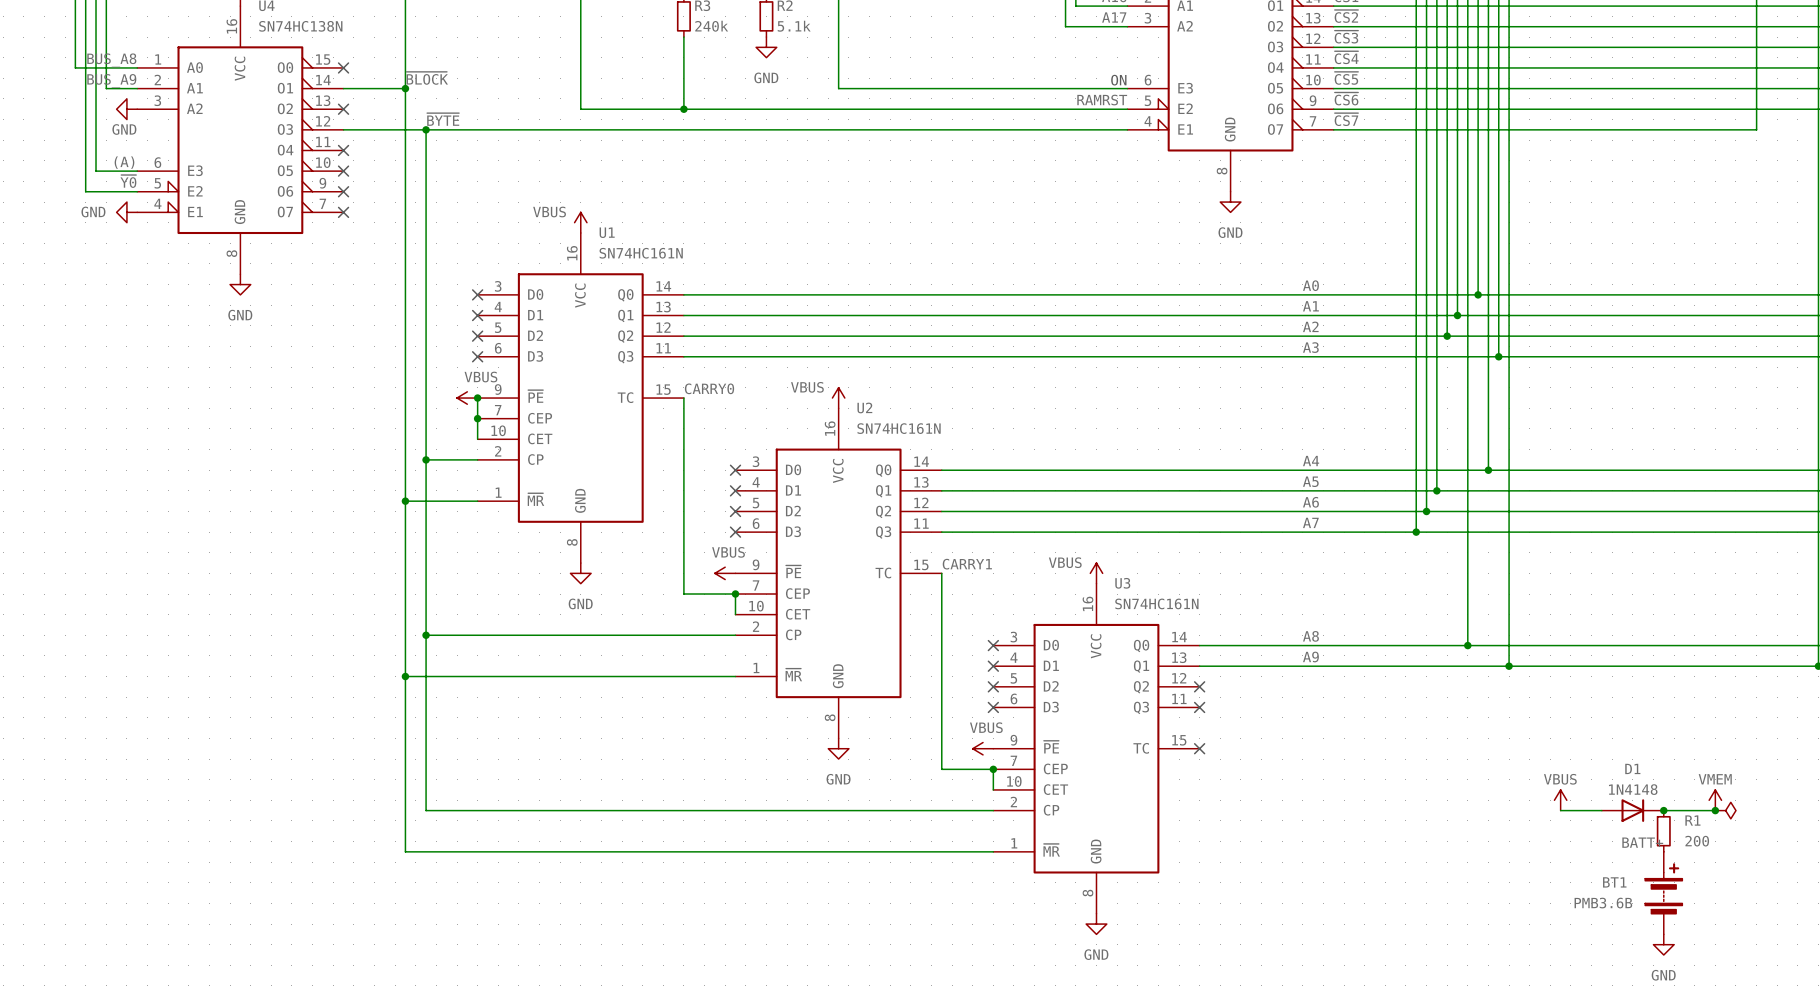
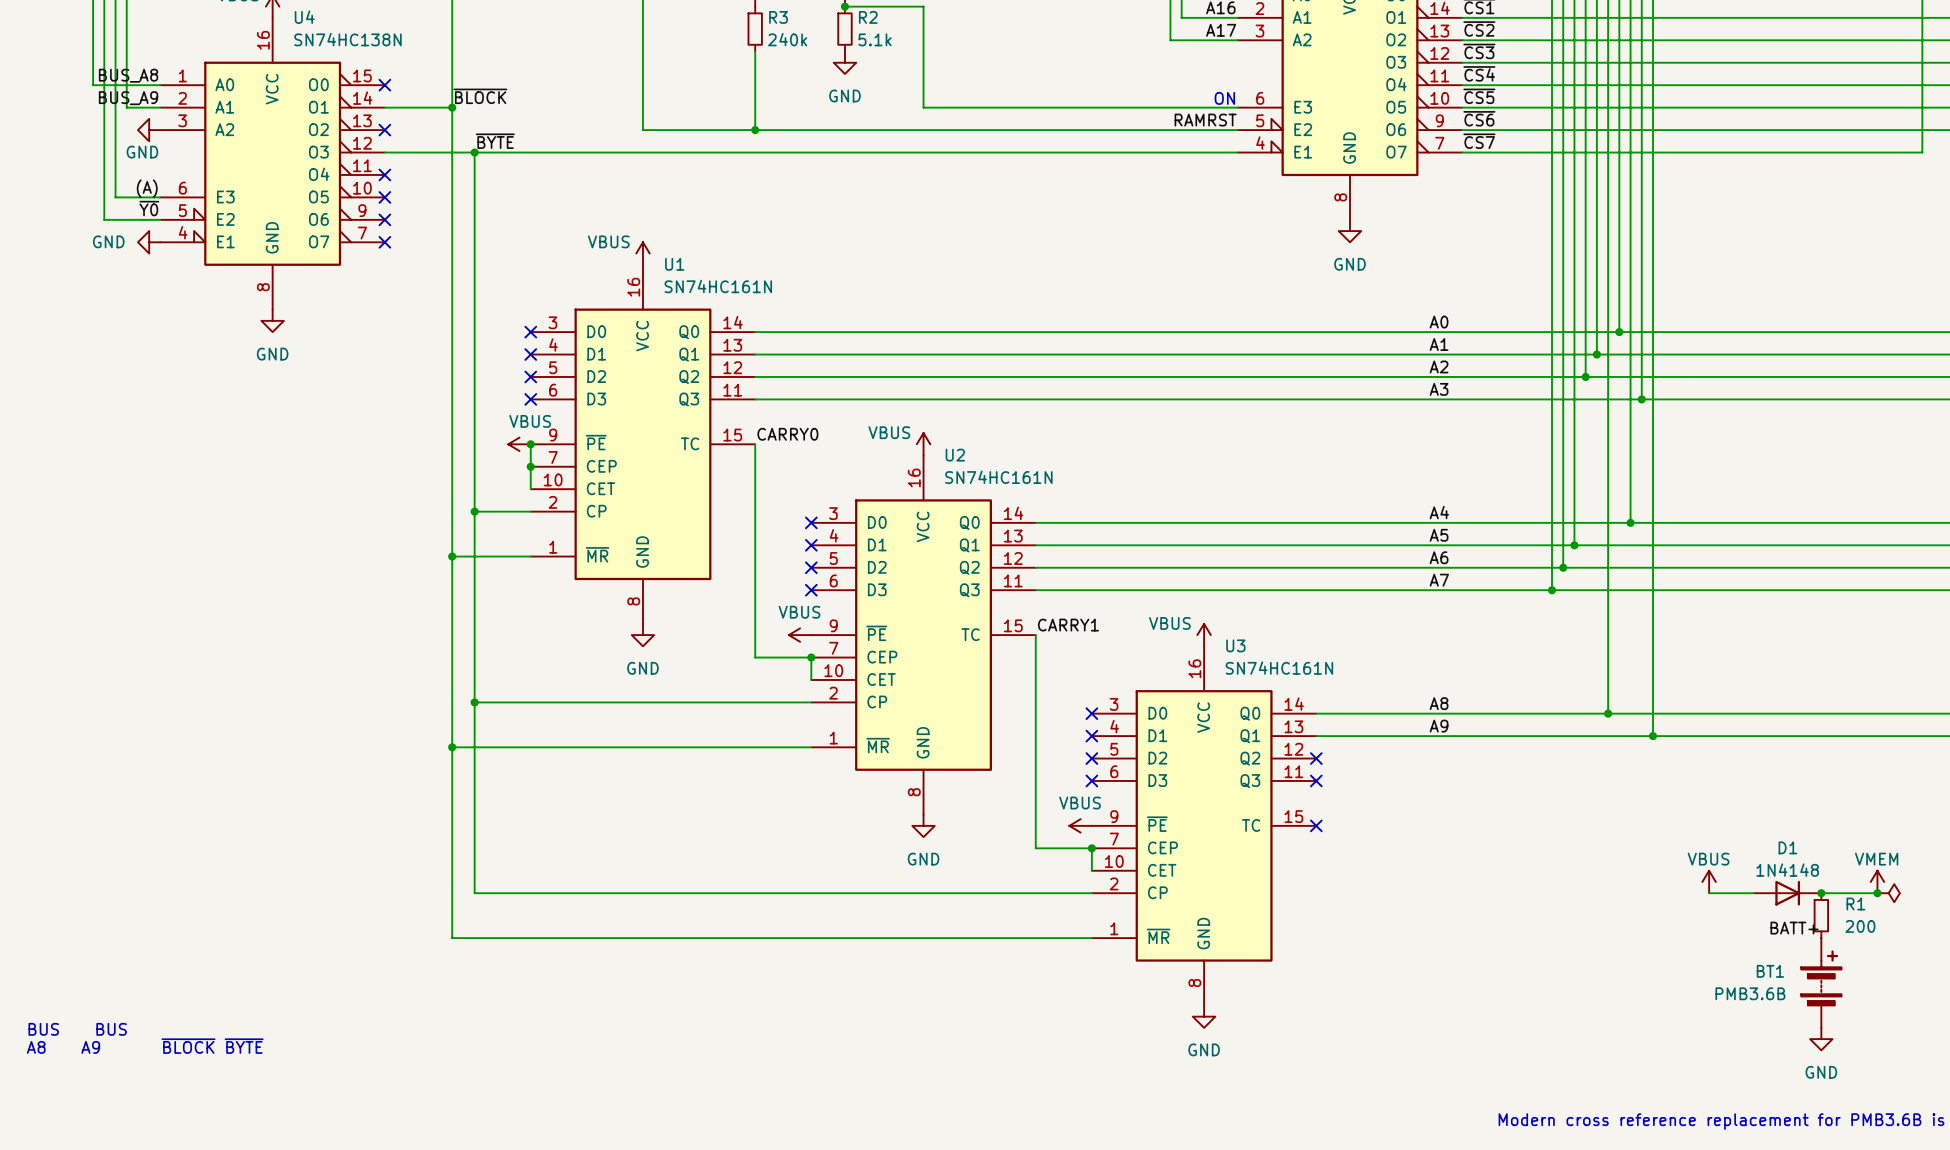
text: none -> BUS BUS (77, 1029)
text: none -> A8 A9 ~{BLOCK} ~{BYTE} (145, 1046)

